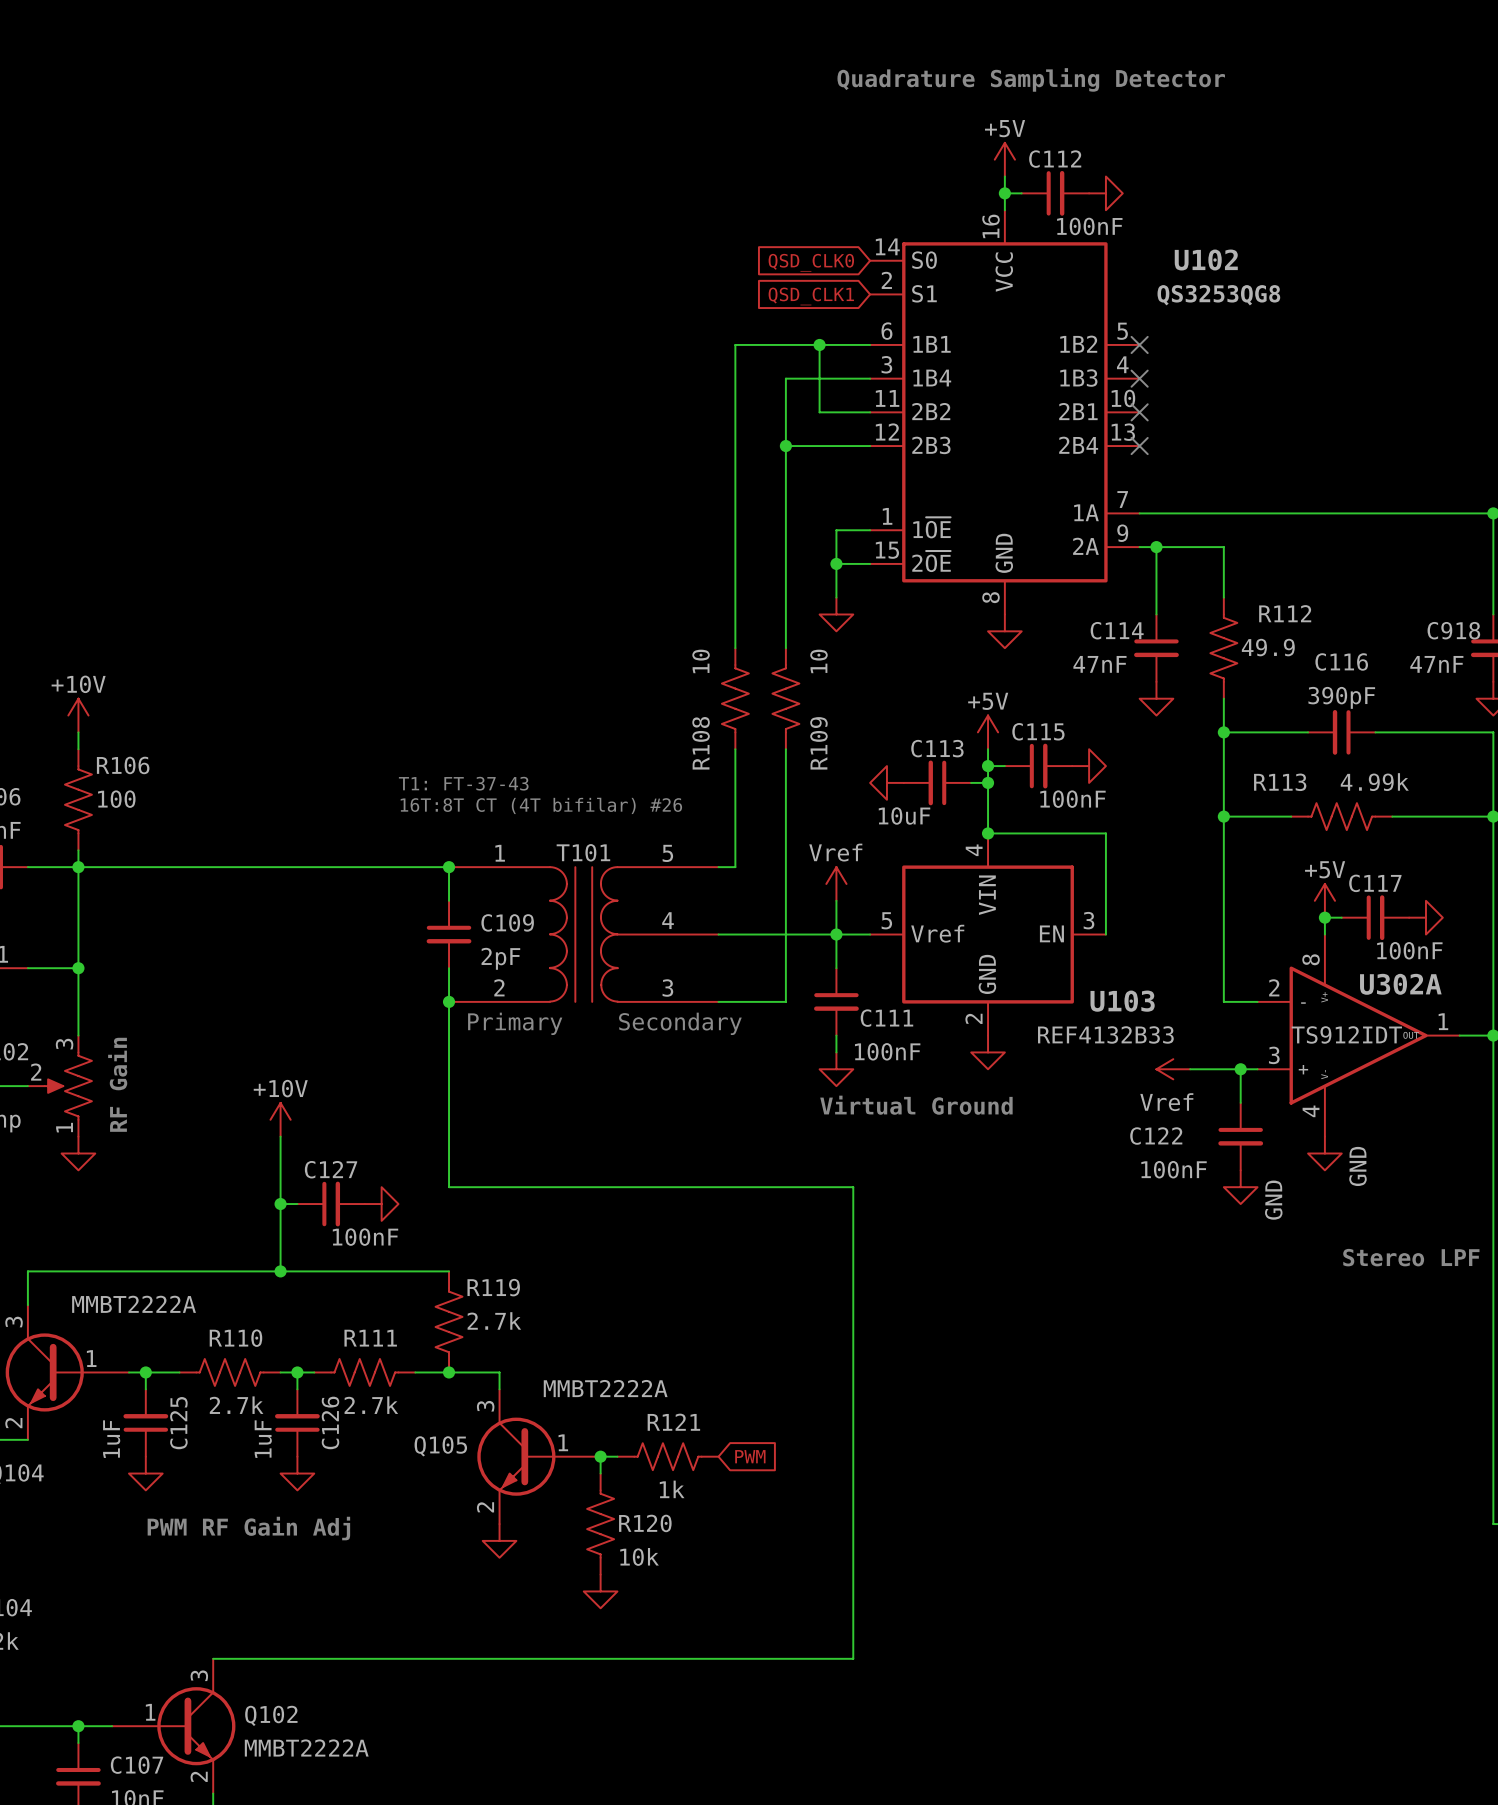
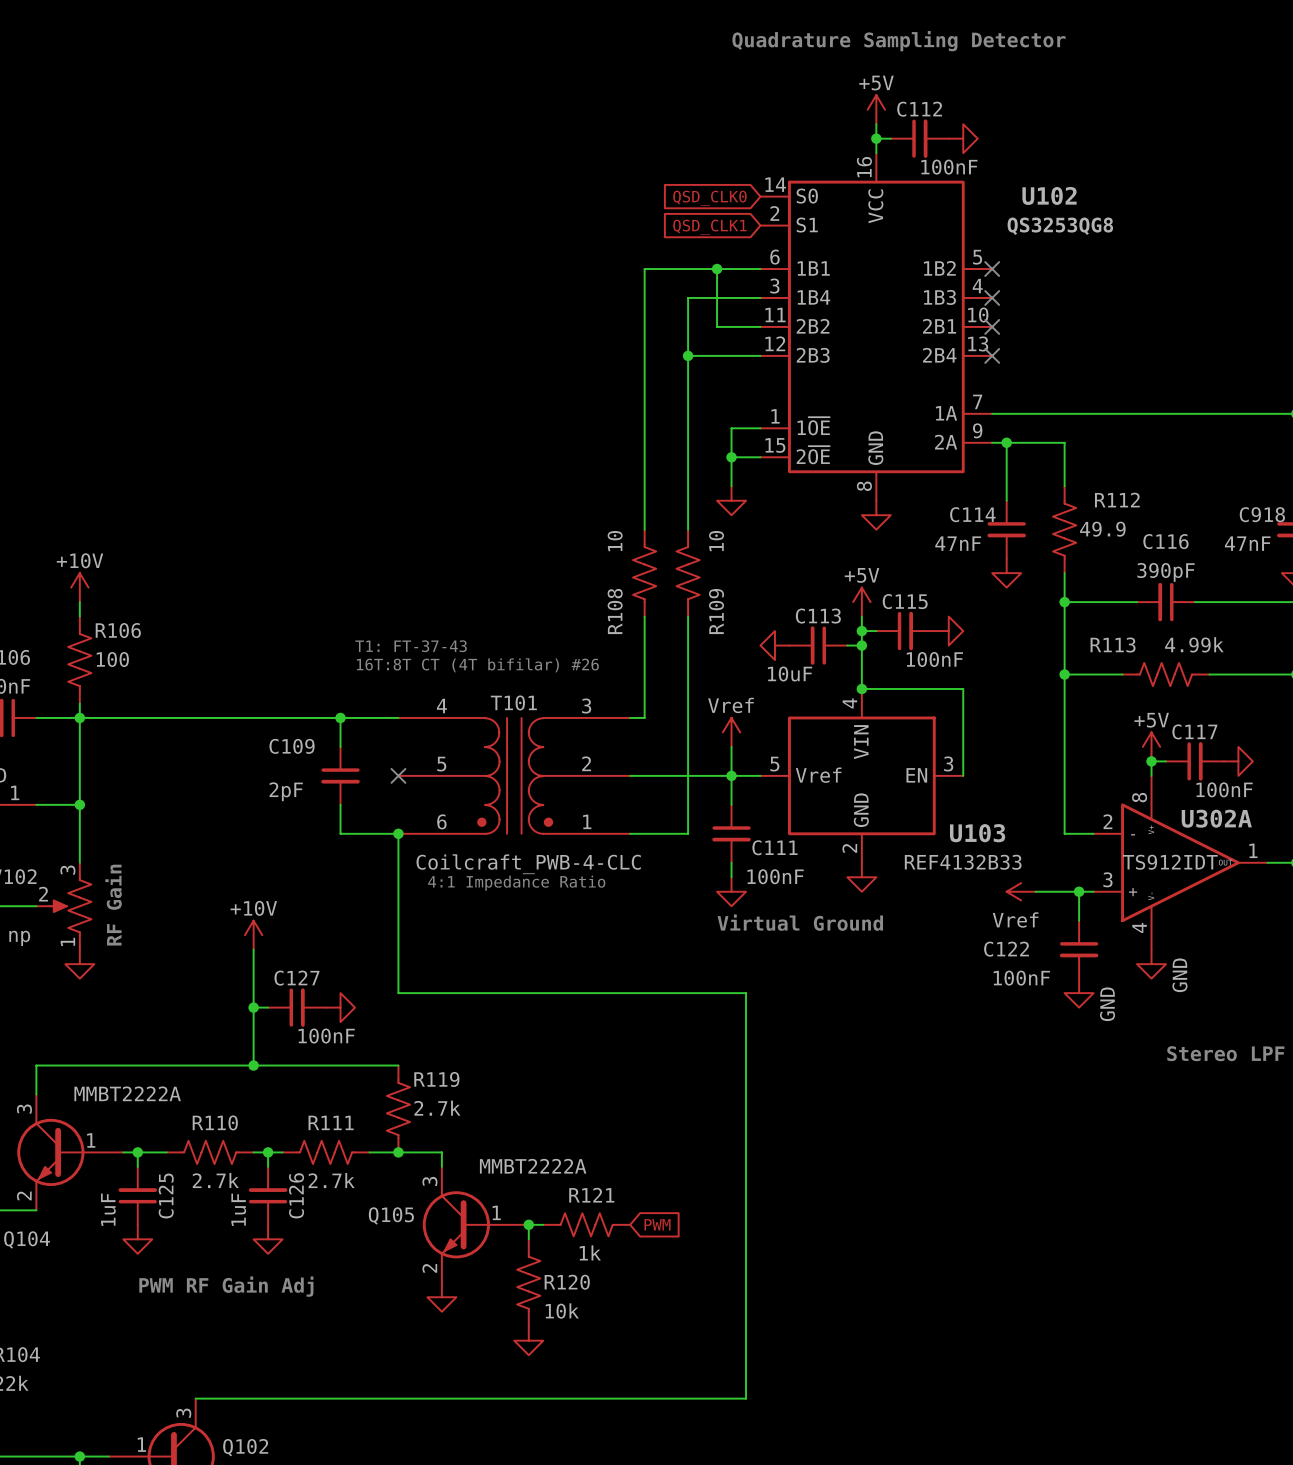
wire: (449, 867) (449, 900) -> (340, 717) (340, 746)
junction position: (449, 867) -> (340, 717)
T101 symbol: [449, 867, 719, 1002] -> [398, 717, 631, 834]
C109 name position: C109 (507, 922) -> C109 (292, 746)
C109 position: (449, 934) -> (340, 775)
no-connect mark: none -> (398, 775)
C109 value position: 2pF (500, 958) -> 2pF (286, 791)
wire: (449, 968) (449, 1001) -> (340, 804) (340, 833) (398, 833)
text: Primary (515, 1023) -> none
text: Secondary (680, 1023) -> none
T101 value: none -> Coilcraft_PWB-4-CLC (528, 864)
text: none -> 4:1 Impedance Ratio (516, 883)

